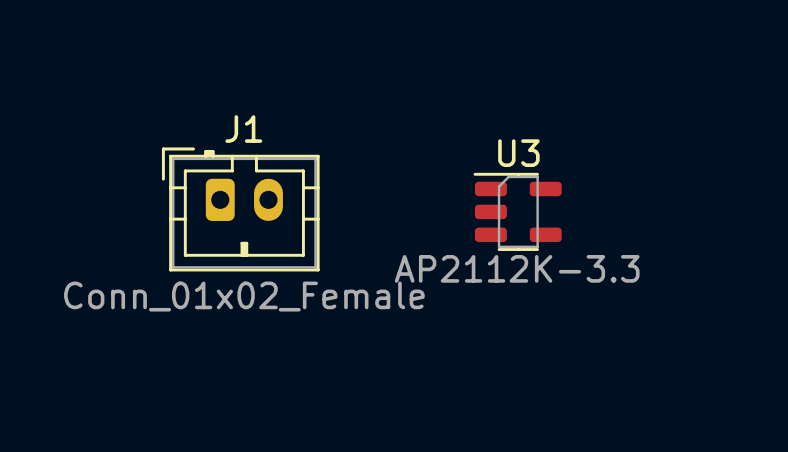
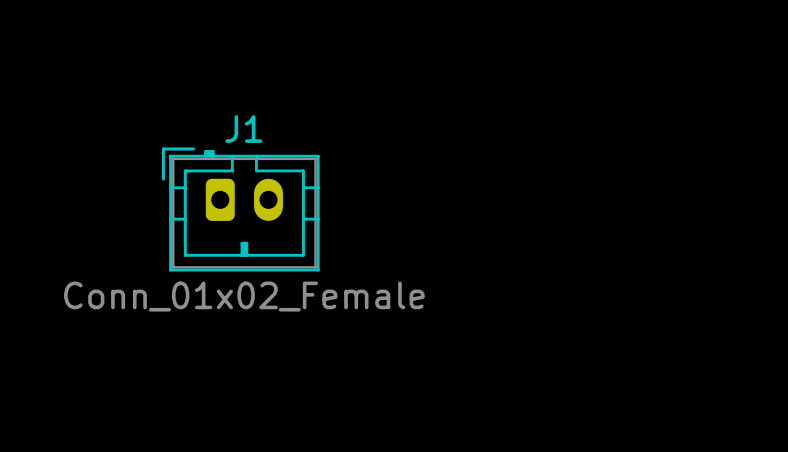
U3: AP2112K-3.3 (517, 211) -> none

